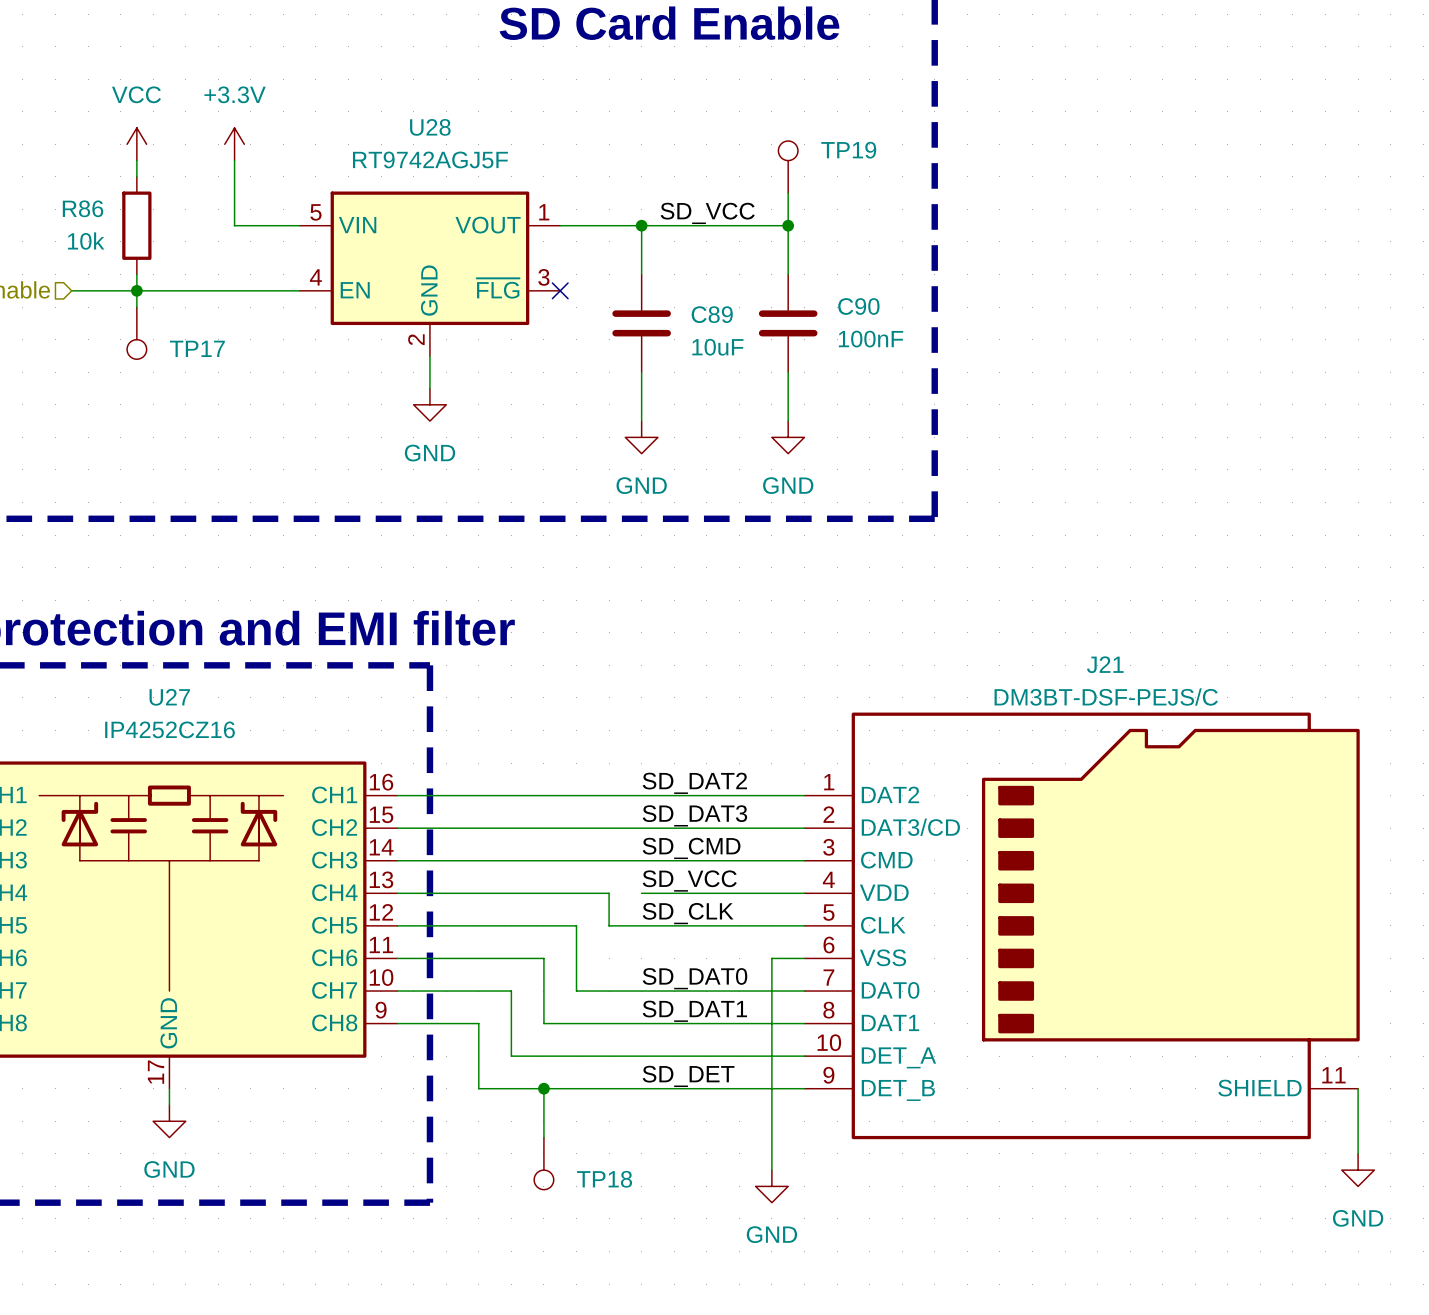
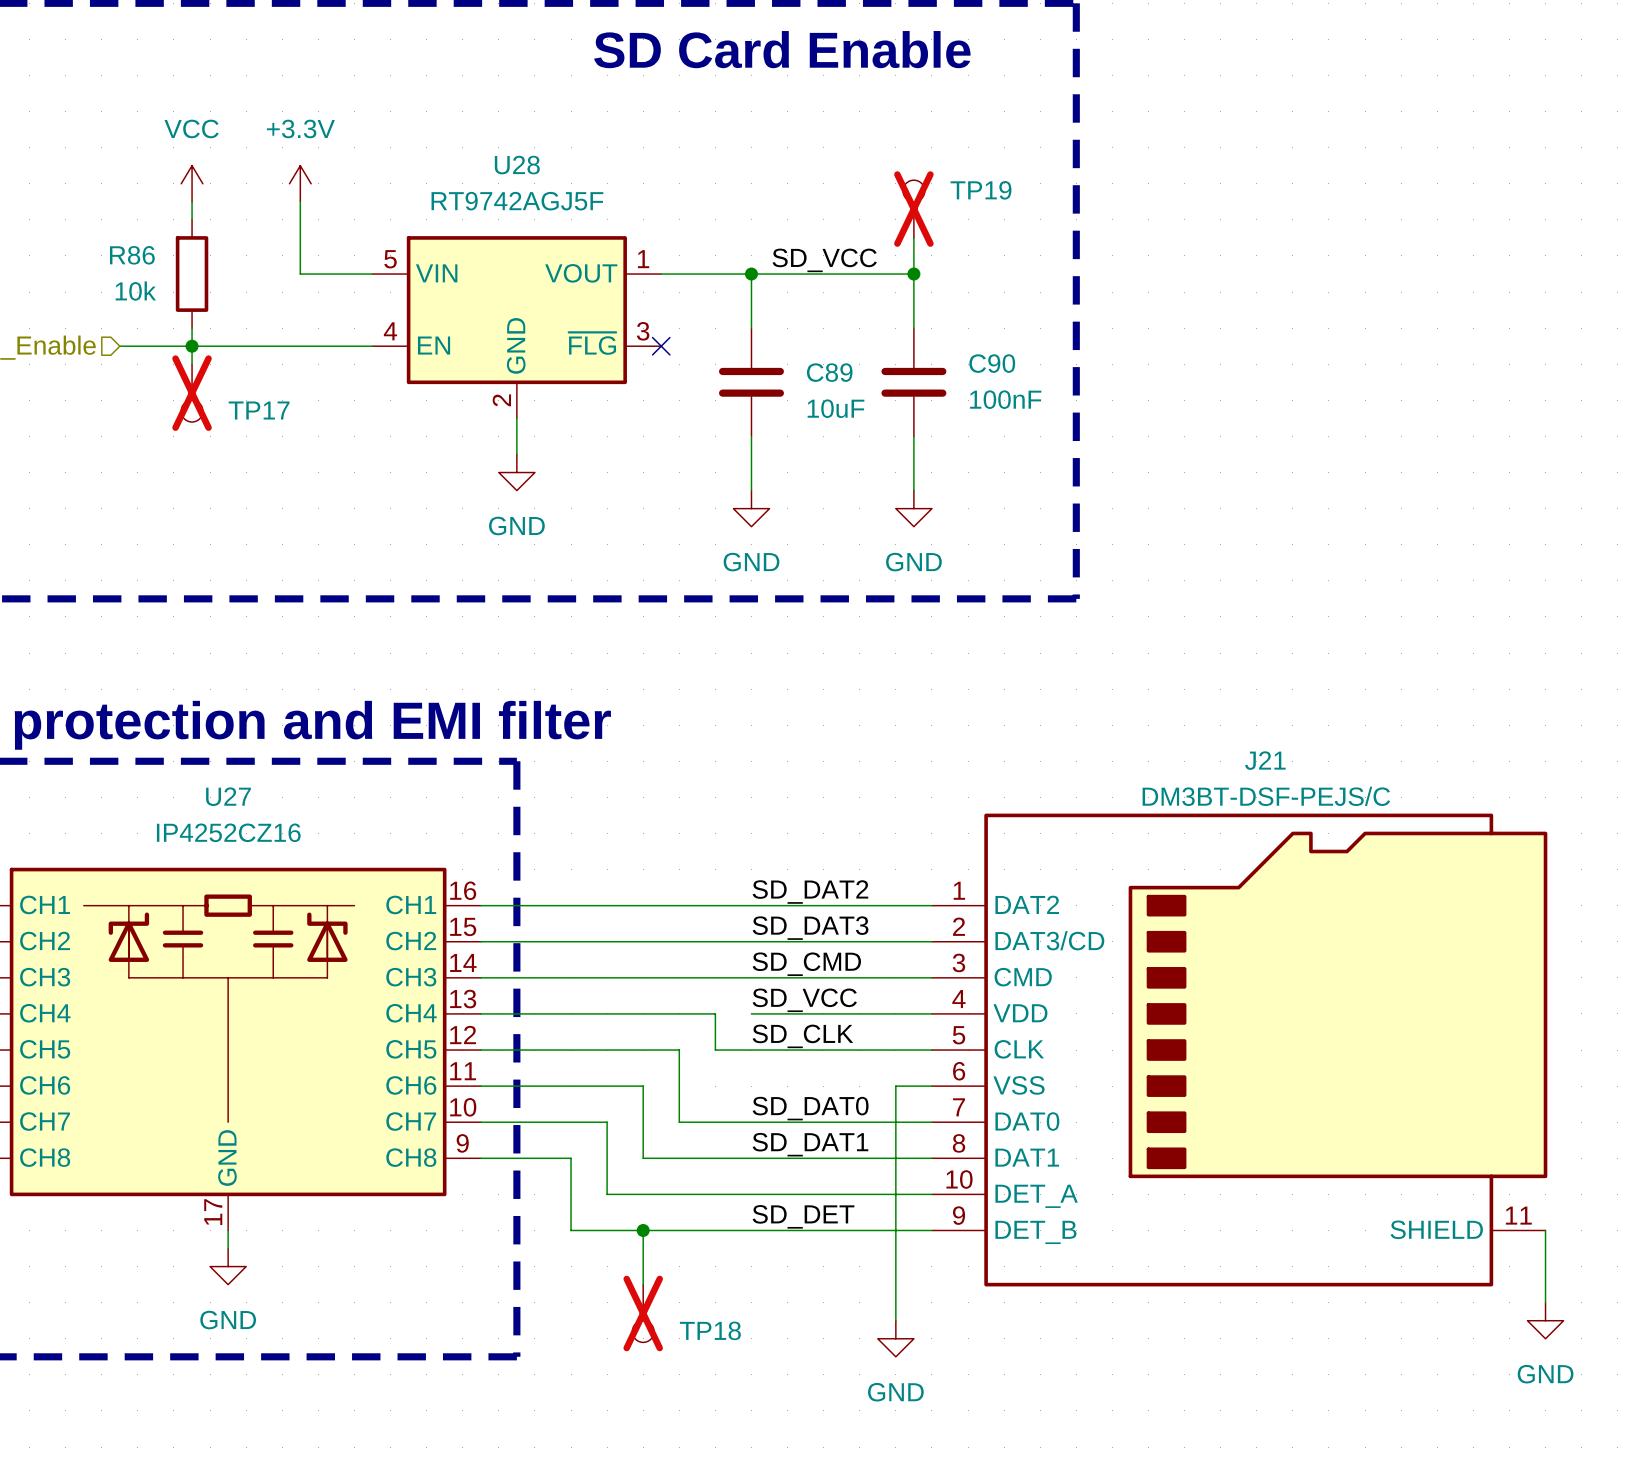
TP19 do-not-place cross: none -> (913, 209)
TP17 do-not-place cross: none -> (192, 393)
TP18 do-not-place cross: none -> (643, 1313)

